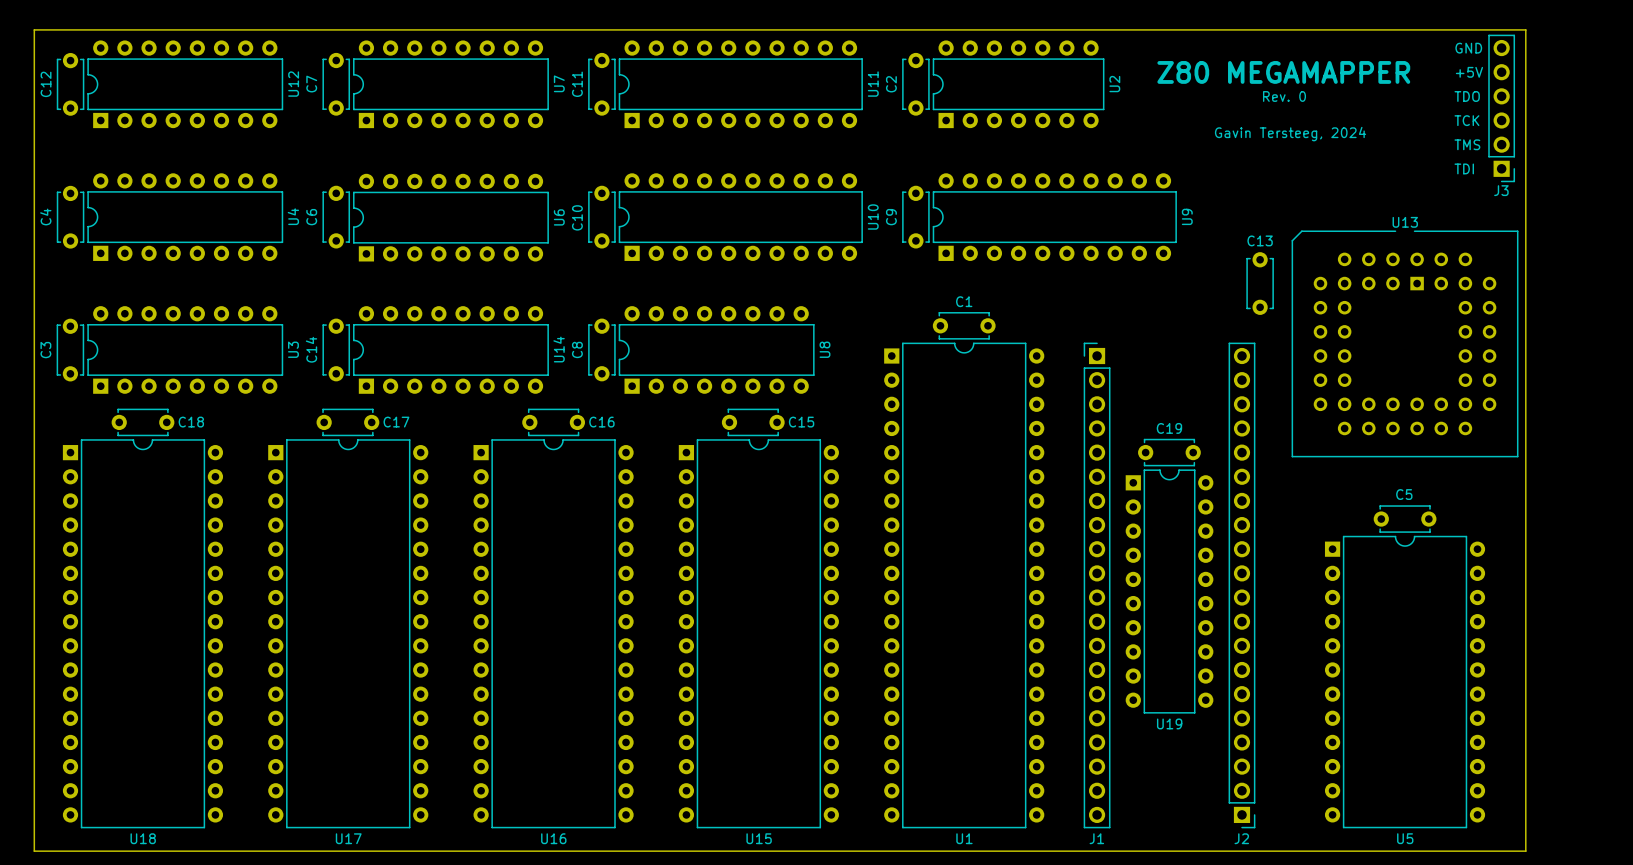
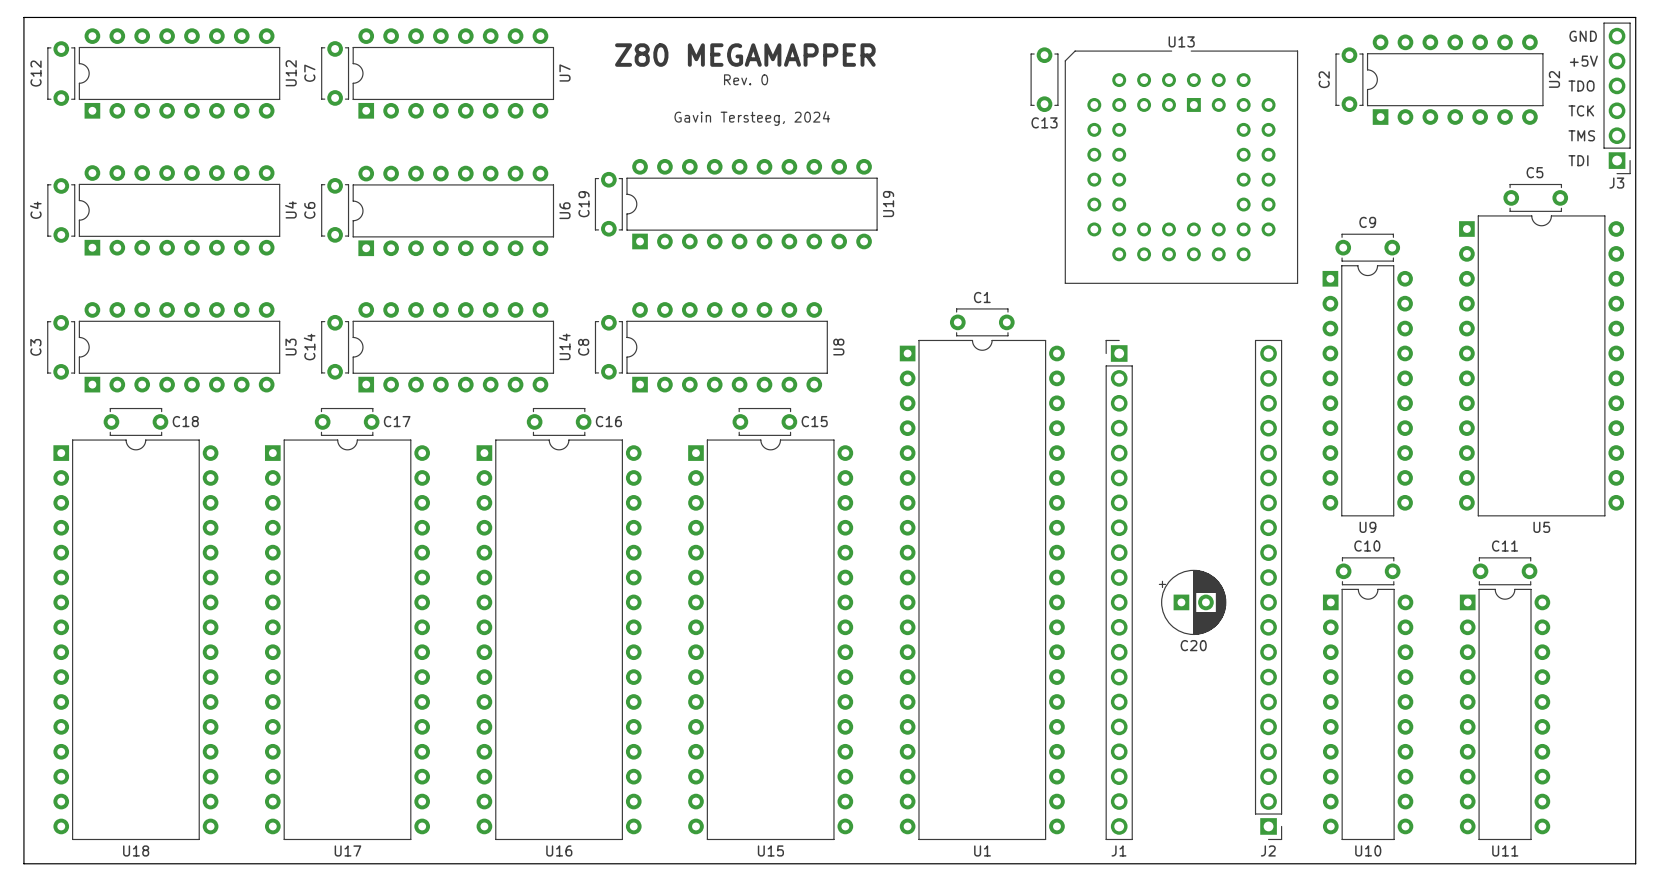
board edge: (1525, 29) (1525, 851) -> (1561, 17) (1635, 17) (1635, 863) (1561, 863)
text position: GND (1468, 48) -> GND (1583, 36)
text: none -> Z80 MEGAMAPPER (745, 55)
text: Z80 MEGAMAPPER (1283, 72) -> none
text position: +5V (1469, 72) -> +5V (1583, 61)
C11 rotation: 0° (601, 84) -> 90° clockwise (1505, 571)
C11 position: (601, 84) -> (1505, 571)
U11 rotation: 0° (740, 84) -> 90° clockwise (1505, 714)
U11 position: (740, 84) -> (1505, 714)
C2 position: (915, 84) -> (1349, 79)
U2 position: (1018, 84) -> (1455, 79)
text: none -> Rev. 0 (746, 79)
text: Rev. 0 (1284, 96) -> none
text position: TDO (1467, 96) -> TDO (1581, 86)
J3 position: (1501, 108) -> (1617, 98)
text position: TCK (1466, 120) -> TCK (1581, 110)
text: none -> Gavin Tersteeg, 2024 (752, 118)
text: Gavin Tersteeg, 2024 (1290, 134) -> none
text position: TMS (1467, 144) -> TMS (1581, 135)
text position: TDI (1464, 168) -> TDI (1578, 160)
C10 rotation: 0° (601, 217) -> 90° clockwise (1368, 571)
C10 position: (601, 217) -> (1368, 571)
U10 rotation: 0° (740, 217) -> 90° clockwise (1368, 714)
U10 position: (740, 217) -> (1368, 714)
C9 rotation: 0° (915, 217) -> 90° clockwise (1367, 247)
C9 position: (915, 217) -> (1367, 247)
U9 rotation: 0° (1054, 217) -> 90° clockwise (1367, 390)
U9 position: (1054, 217) -> (1367, 390)
C13 name position: C13 (1260, 240) -> C13 (1044, 122)
C13 position: (1260, 283) -> (1044, 79)
U13 position: (1405, 343) -> (1181, 167)
C19 name position: C19 (1169, 428) -> C19 (584, 204)
C19 rotation: 0° (1169, 452) -> 90° clockwise (608, 204)
C19 position: (1169, 452) -> (608, 204)
C5 position: (1405, 519) -> (1535, 197)
U19 rotation: 0° (1169, 591) -> 90° counterclockwise (752, 204)
U19 position: (1169, 591) -> (752, 204)
C20: none -> (1192, 602)
U5 position: (1405, 682) -> (1541, 365)

